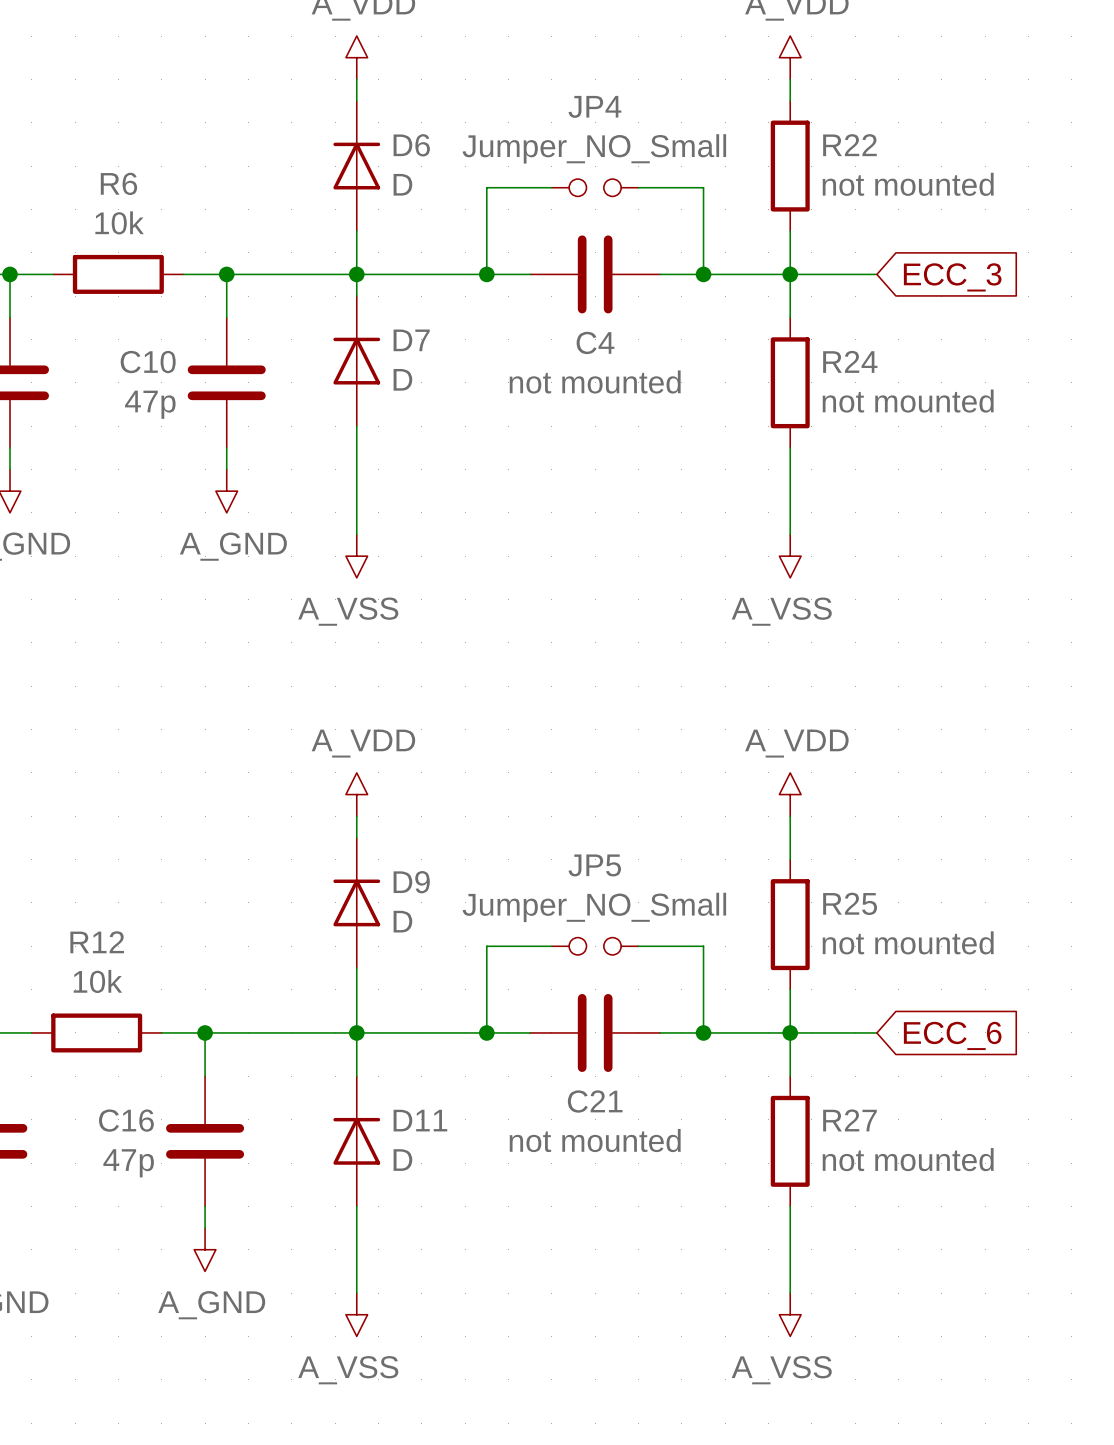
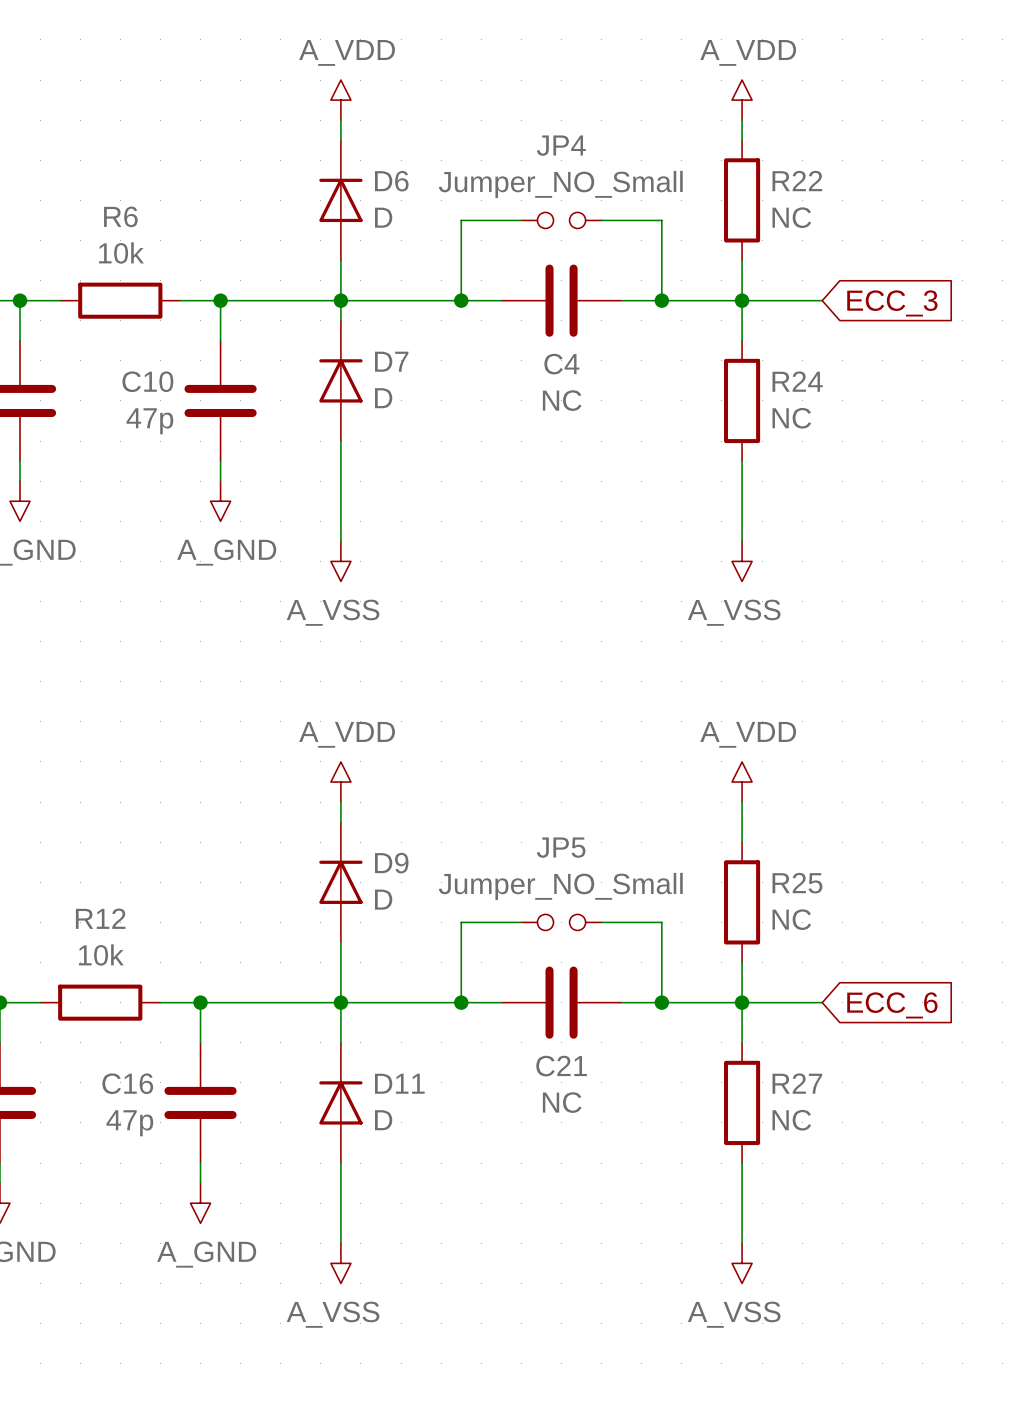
R22 value: not mounted (908, 184) -> NC (791, 217)
C4 value: not mounted (595, 381) -> NC (562, 400)
R24 value: not mounted (908, 401) -> NC (791, 418)
R25 value: not mounted (908, 942) -> NC (791, 919)
C21 value: not mounted (595, 1140) -> NC (562, 1102)
R27 value: not mounted (908, 1159) -> NC (791, 1120)

